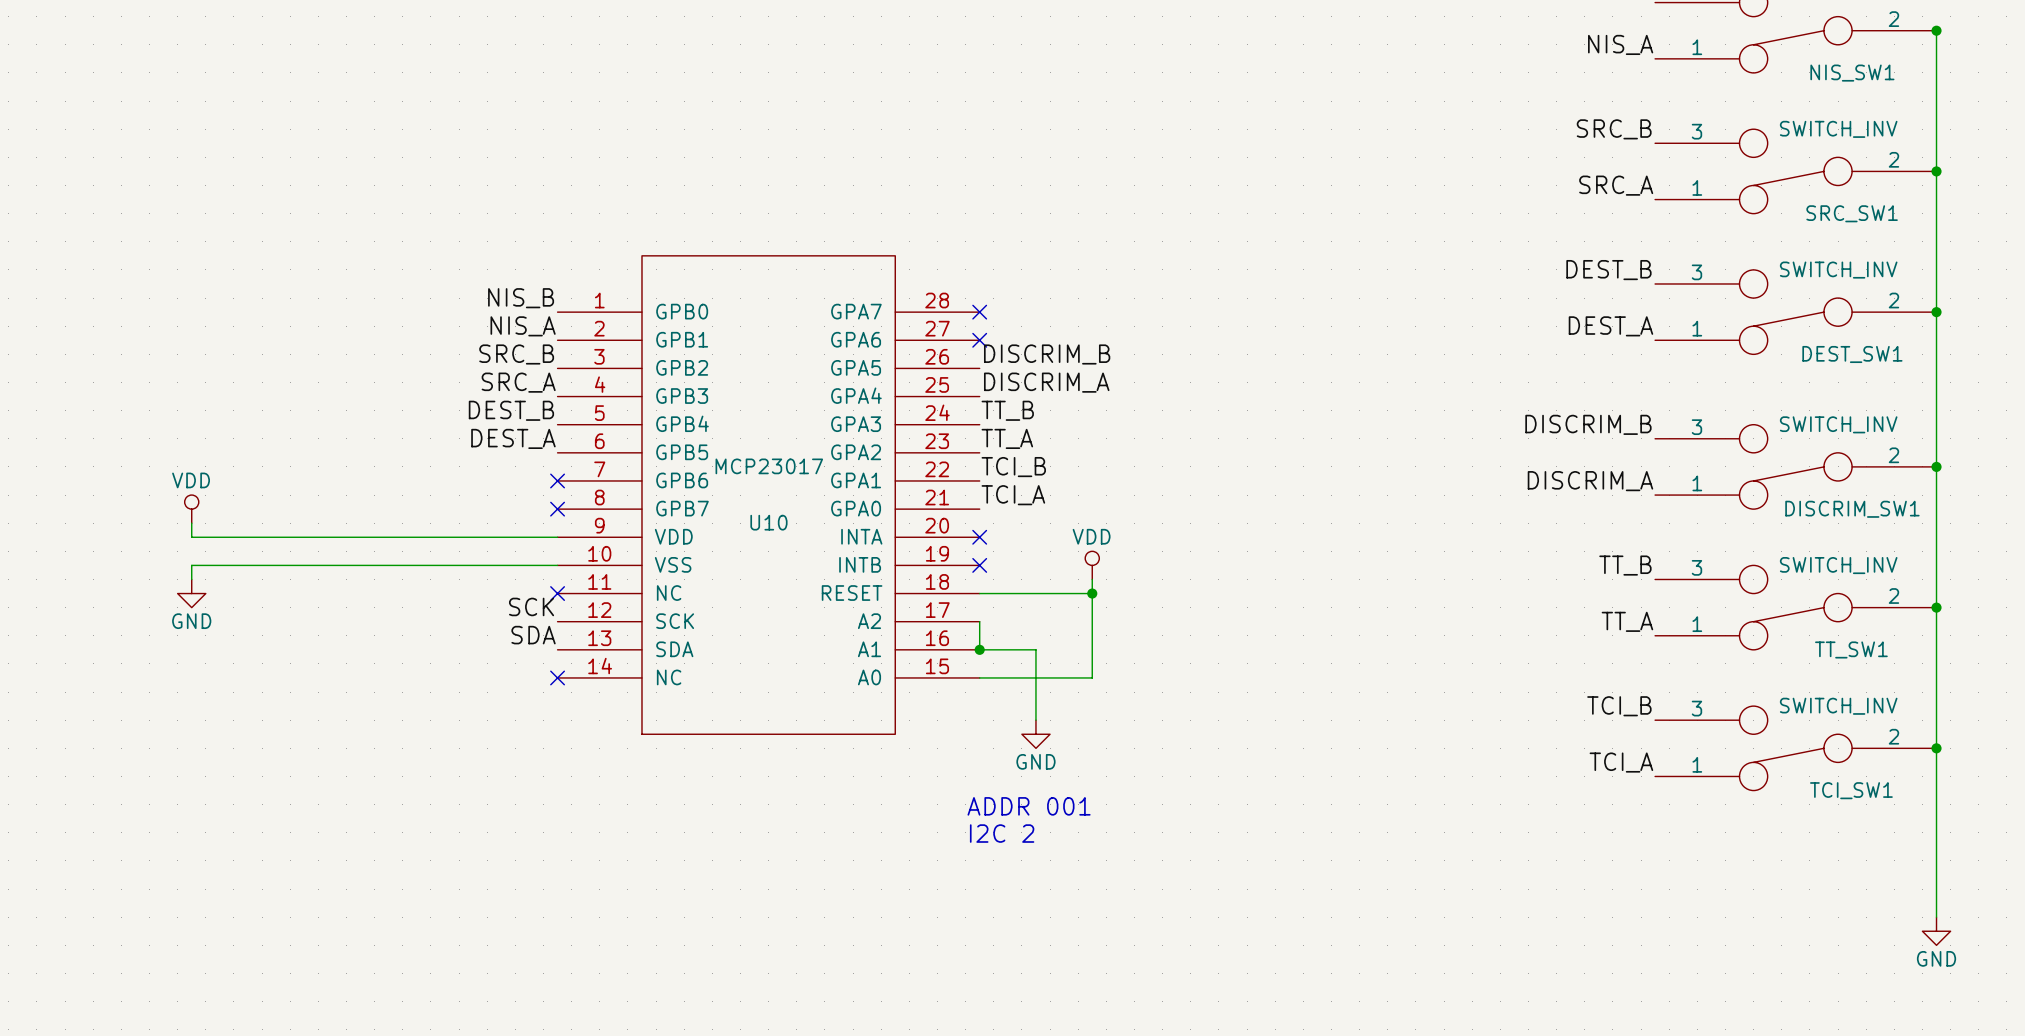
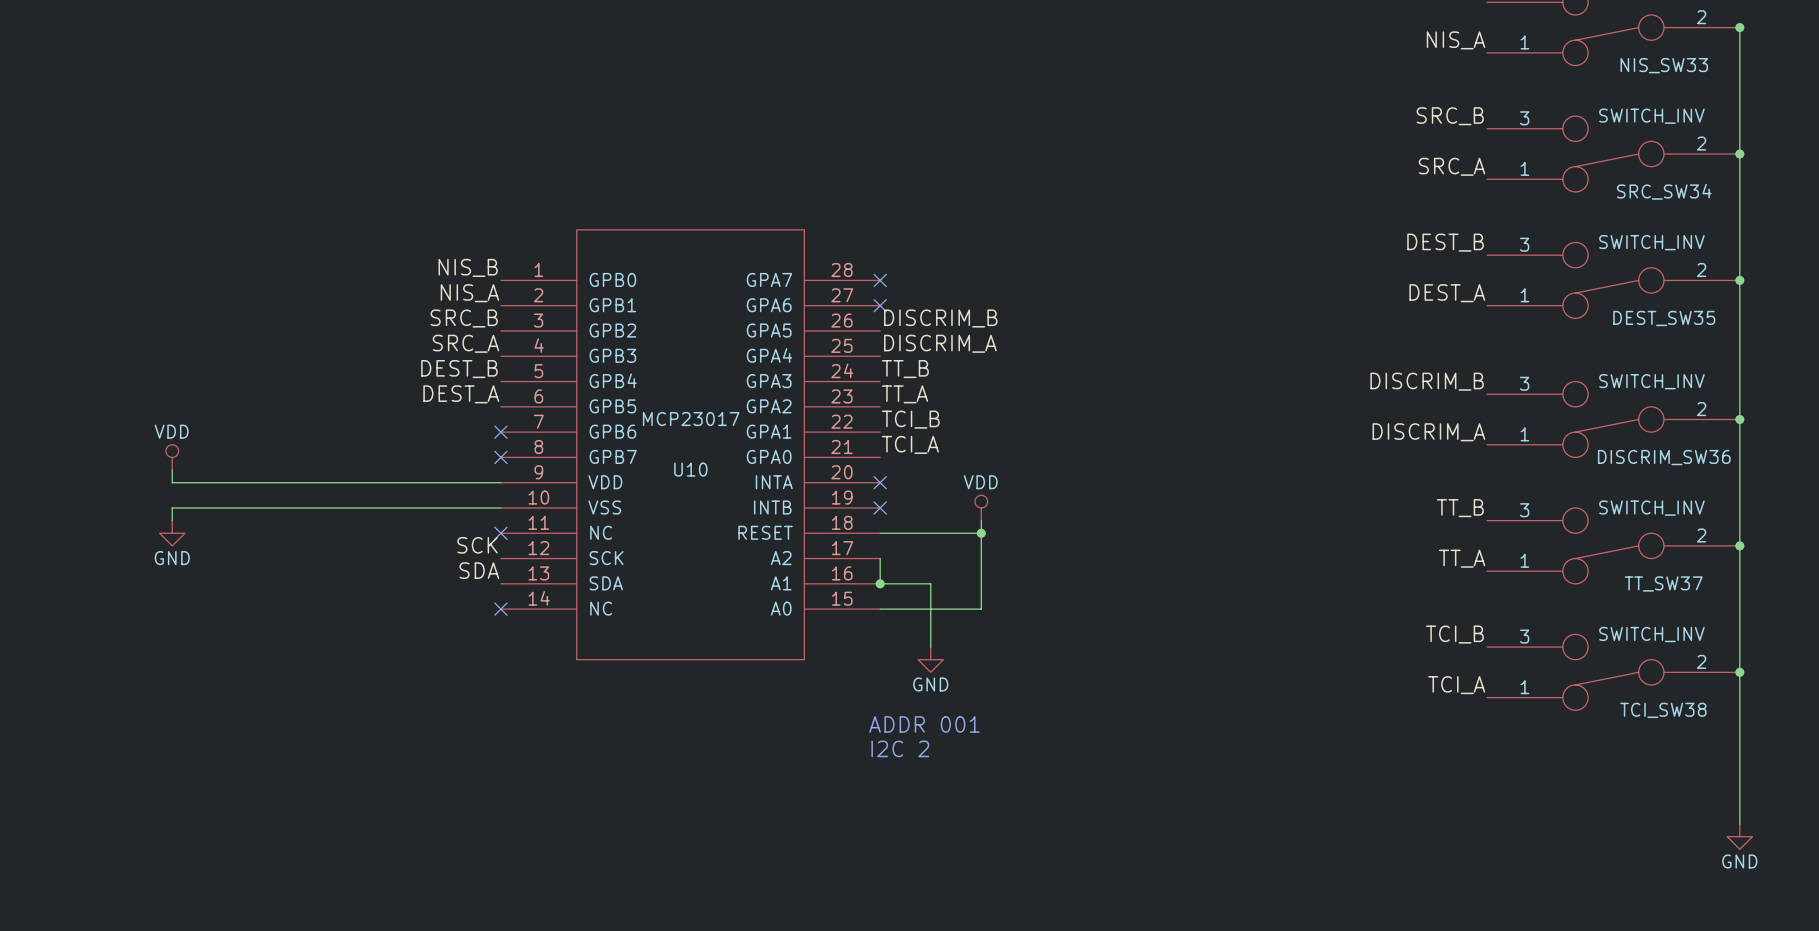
NIS_SW1 name: NIS_SW1 (1852, 73) -> NIS_SW33 (1664, 65)
SRC_SW1 name: SRC_SW1 (1852, 213) -> SRC_SW34 (1664, 191)
DEST_SW1 name: DEST_SW1 (1852, 354) -> DEST_SW35 (1664, 318)
DISCRIM_SW1 name: DISCRIM_SW1 (1852, 509) -> DISCRIM_SW36 (1664, 457)
TT_SW1 name: TT_SW1 (1851, 649) -> TT_SW37 (1663, 583)
TCI_SW1 name: TCI_SW1 (1851, 790) -> TCI_SW38 (1663, 710)

